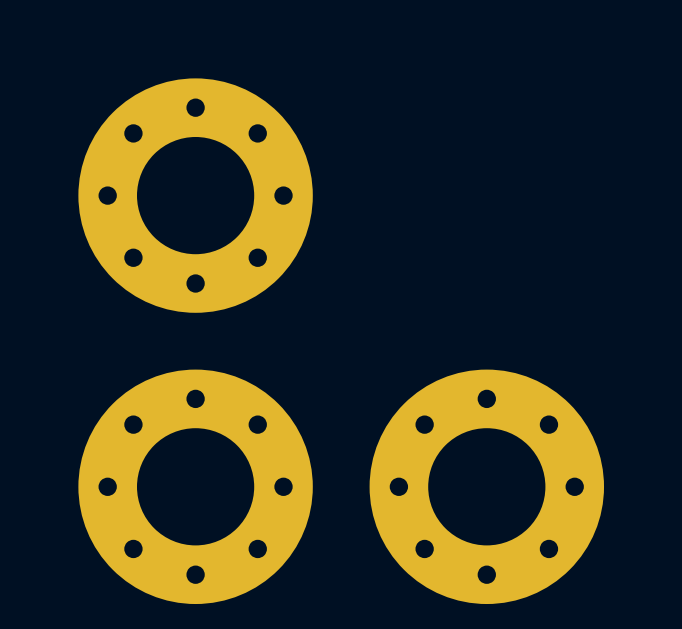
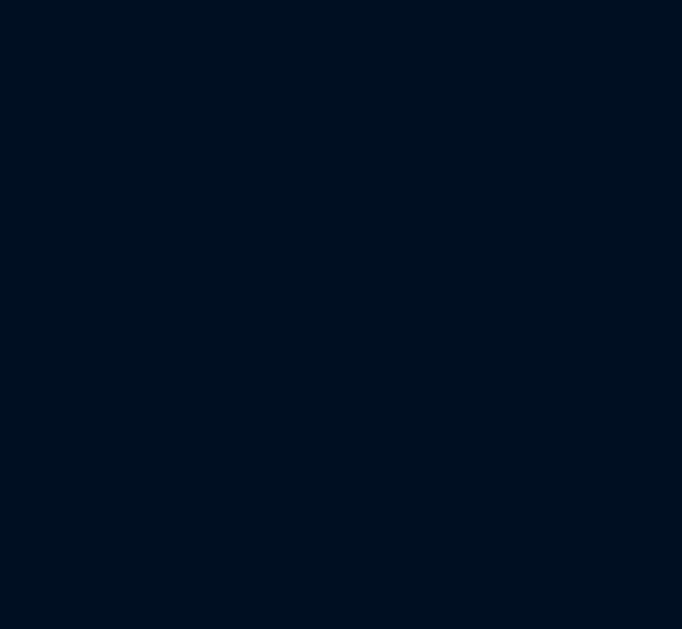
part: (195, 195) -> none
part: (195, 486) -> none
part: (486, 486) -> none

